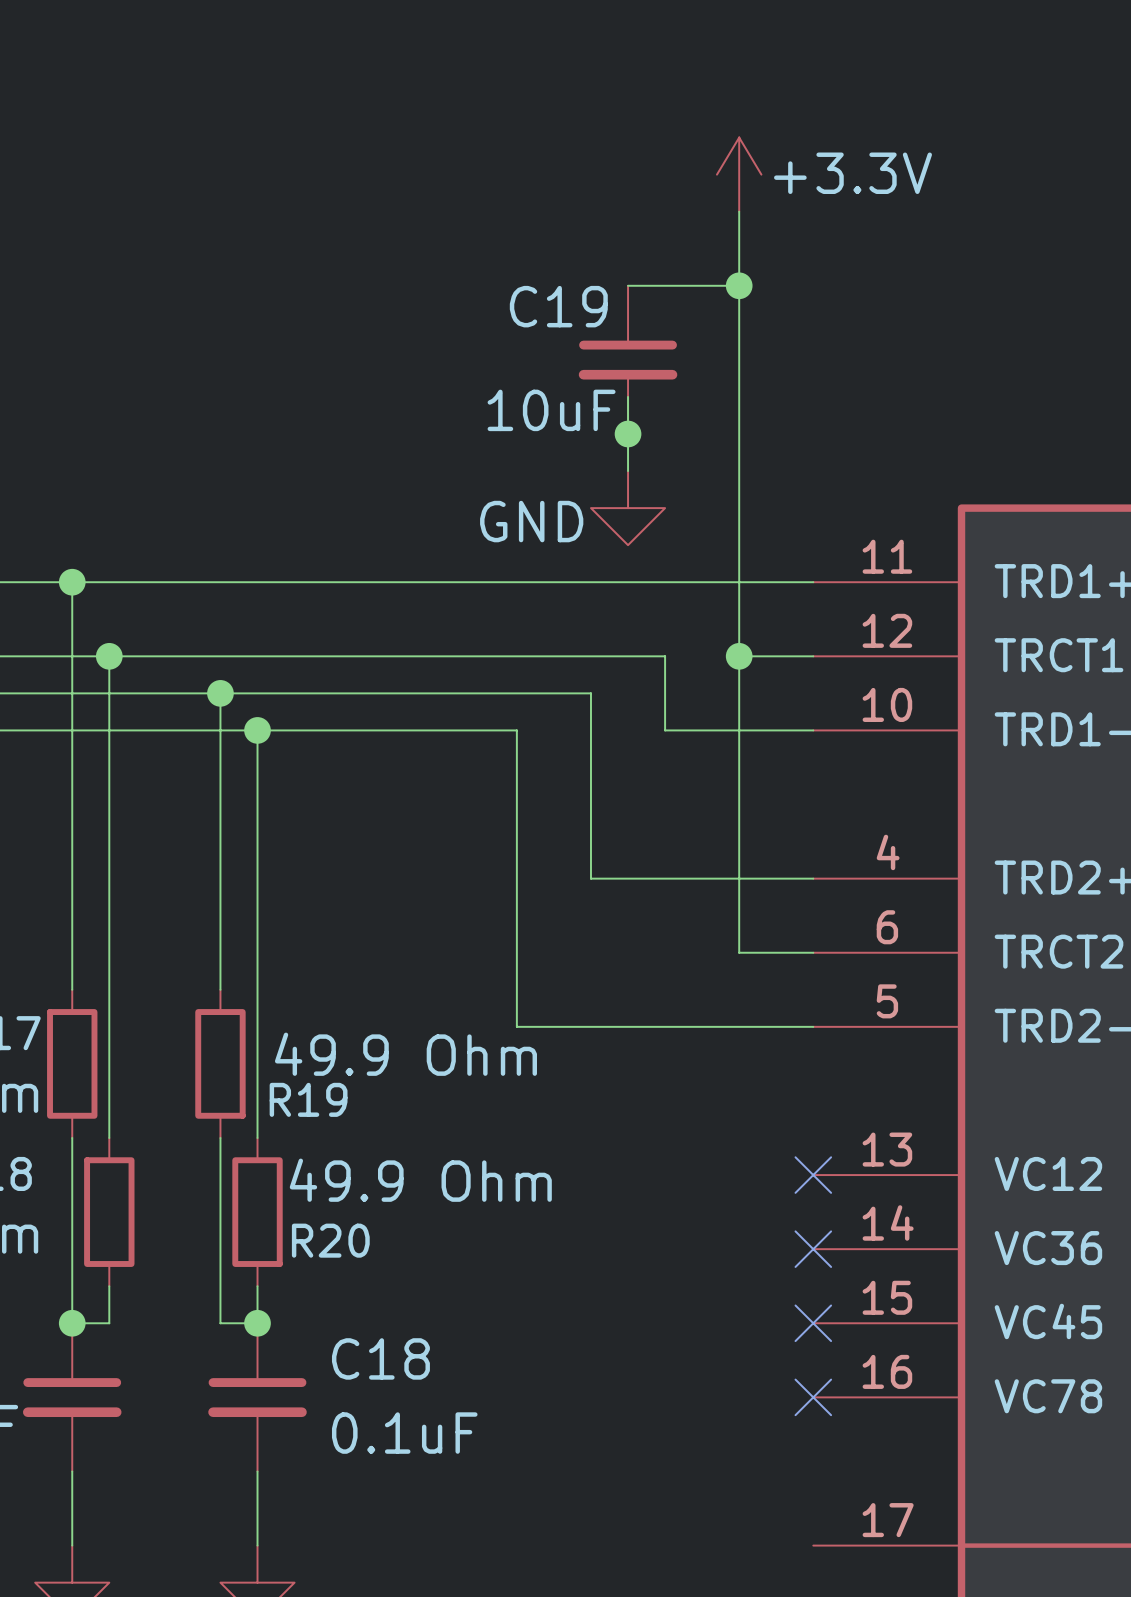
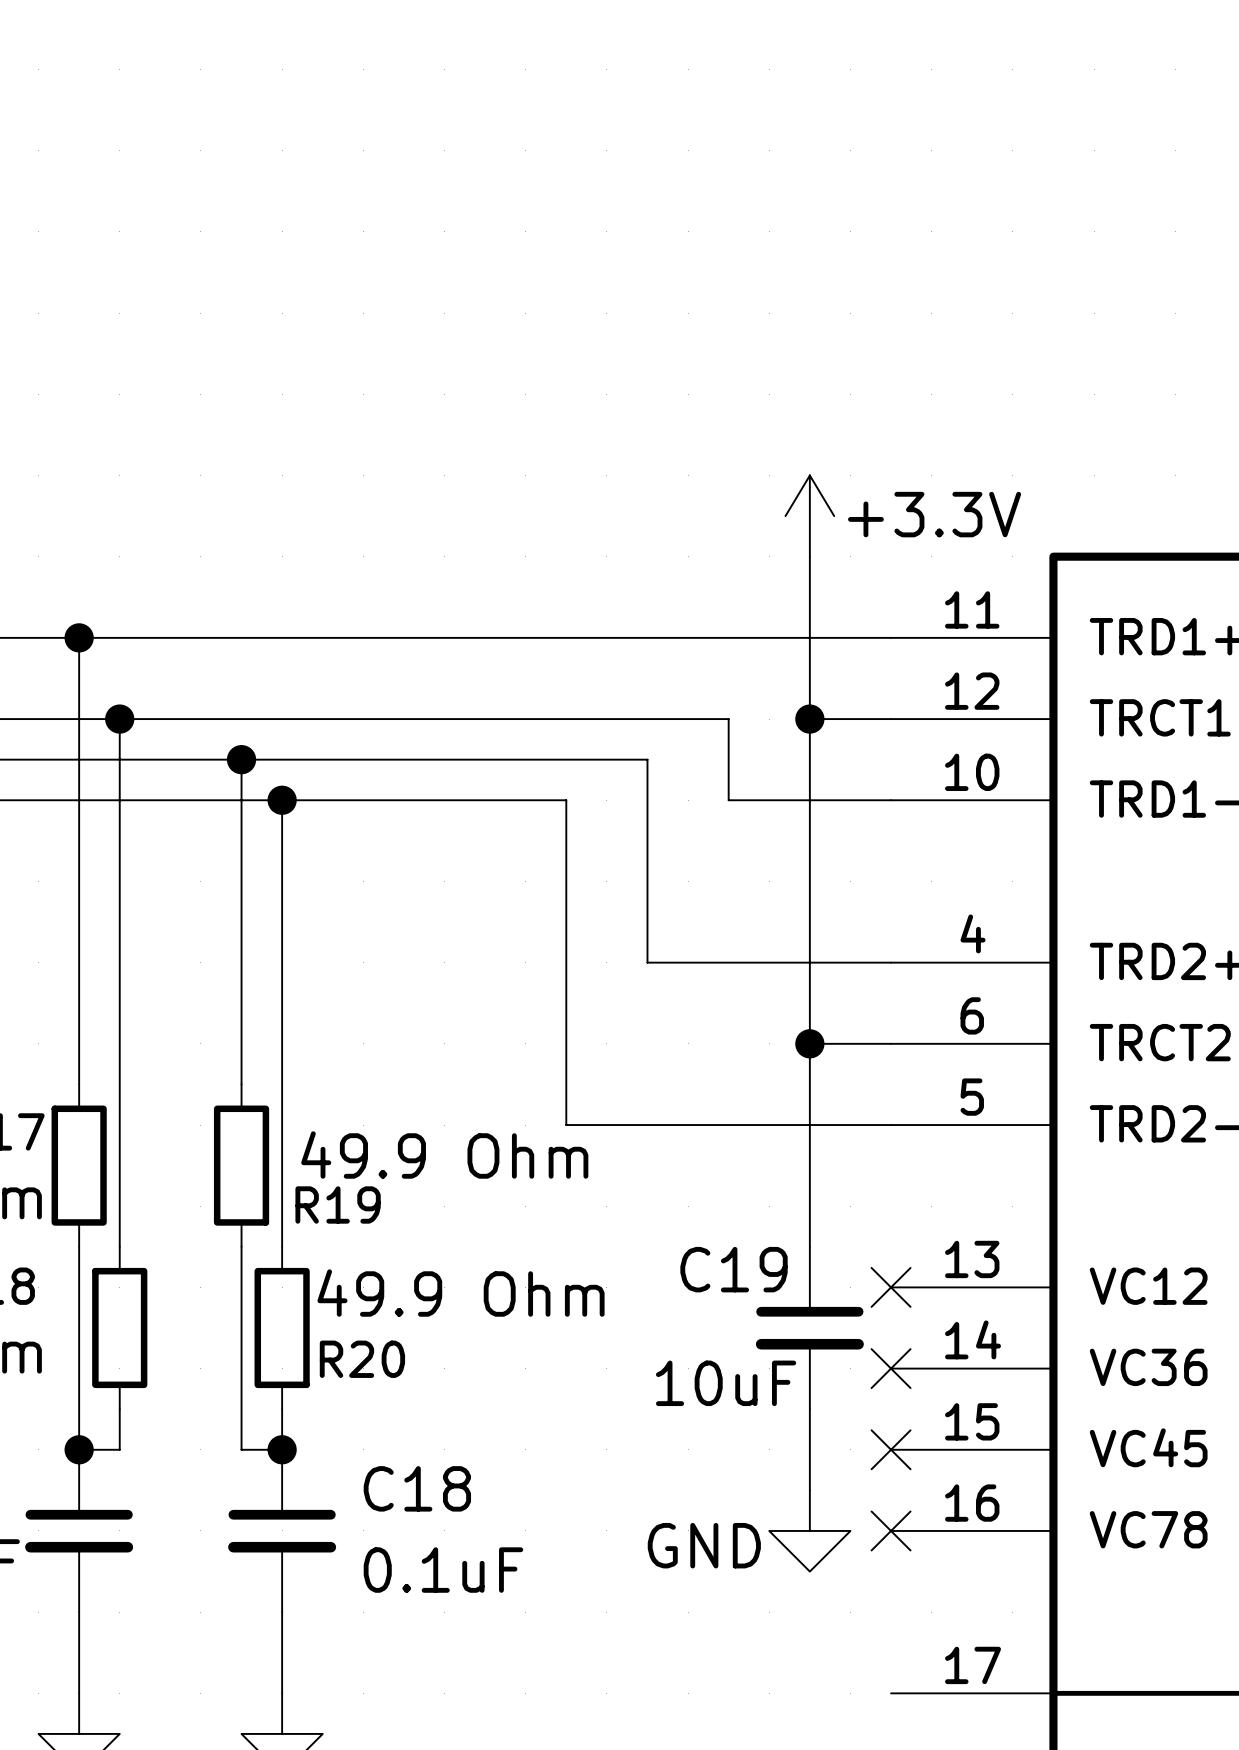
power symbol position: +3.3V (739, 174) -> +3.3V (809, 516)
wire: (739, 211) (739, 508) -> none
wire: (628, 285) (739, 285) -> none
junction: (739, 285) -> none
C19 position: (628, 359) -> (809, 1328)
wire: (628, 396) (628, 471) -> none
junction: (628, 434) -> none
power symbol: GND (628, 508) -> none
wire: none -> (809, 1043) (809, 1246)
junction: none -> (809, 1043)
wire: none -> (809, 1409) (809, 1490)
power symbol: none -> GND (809, 1530)

